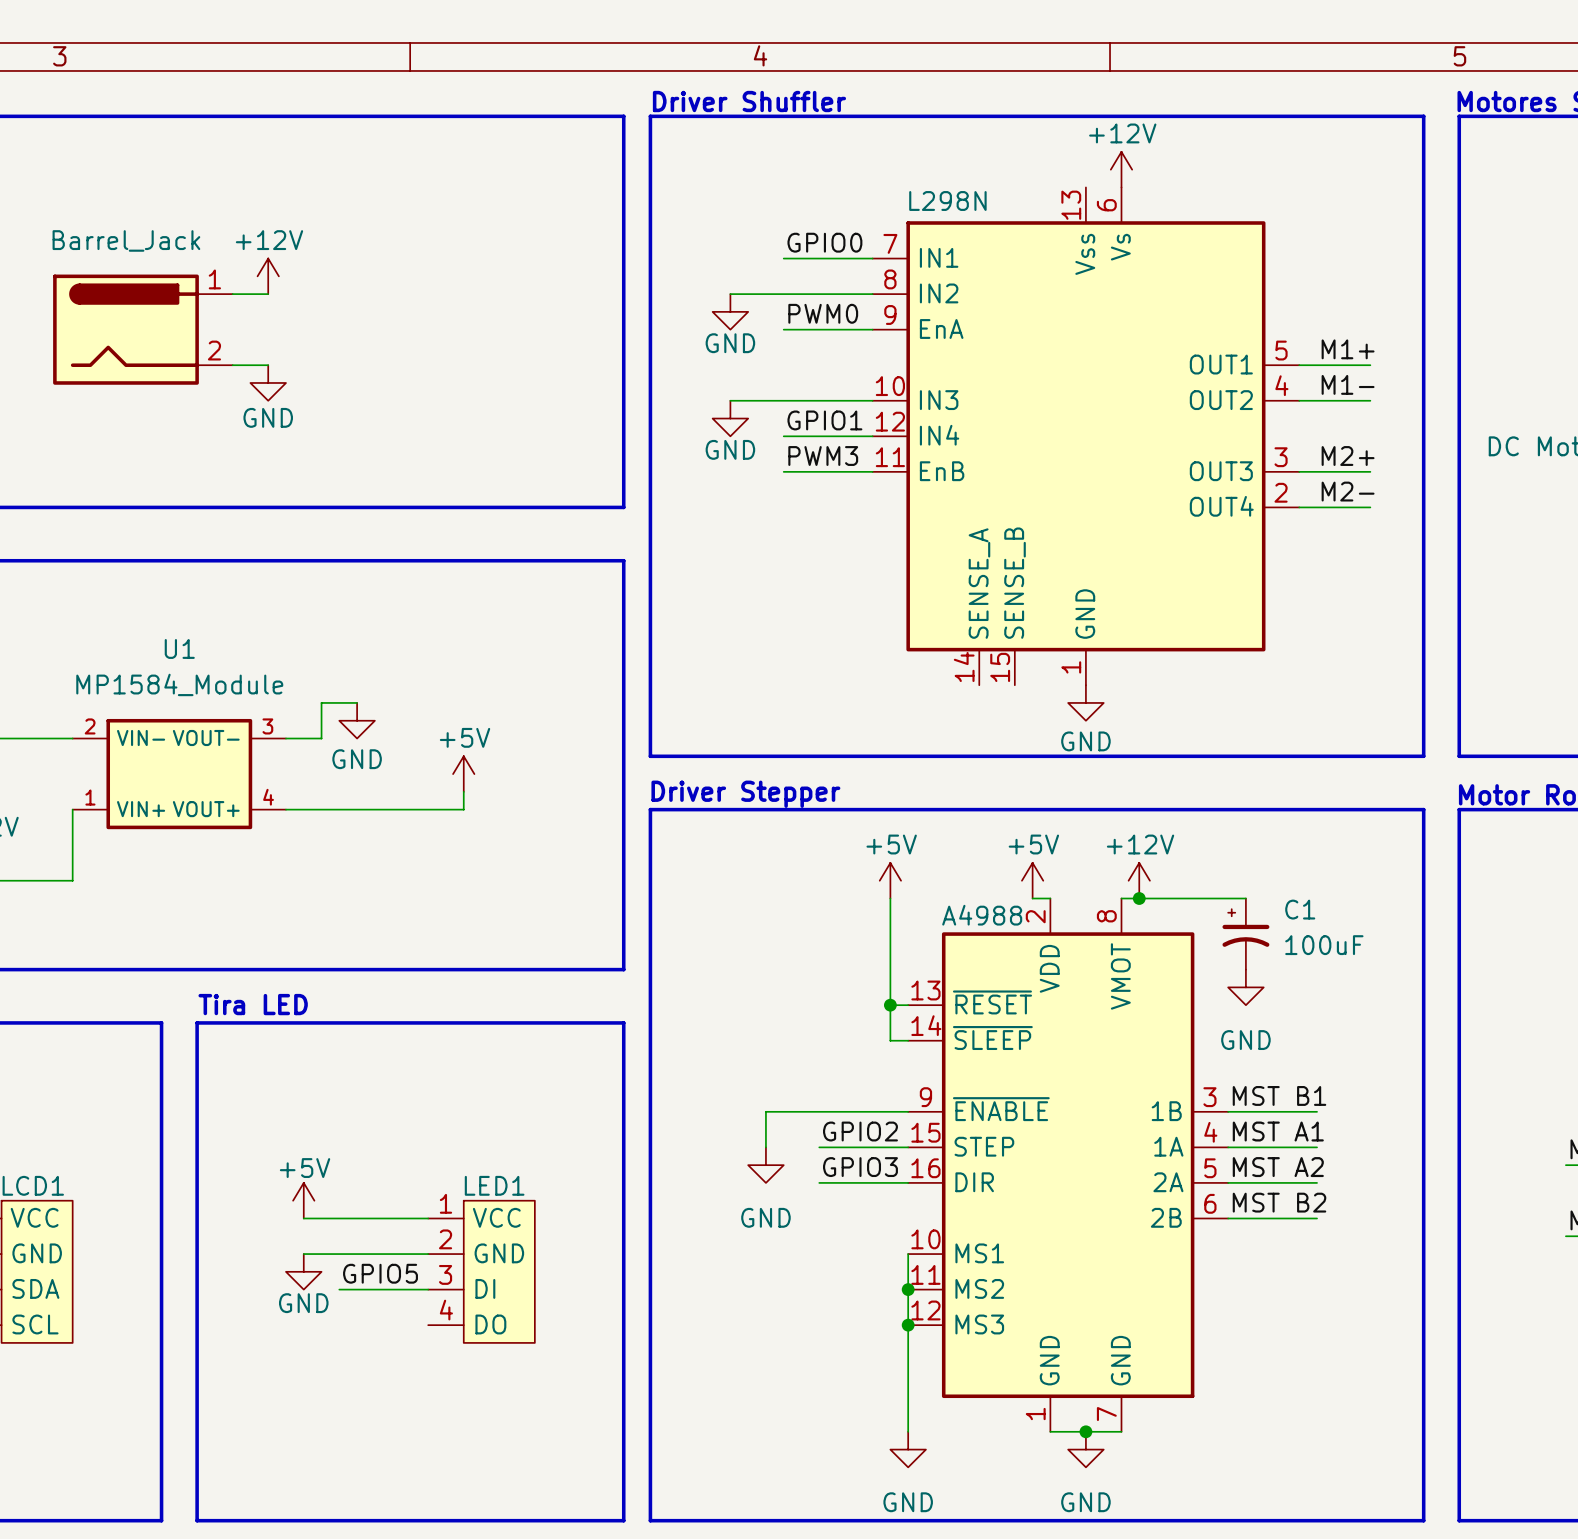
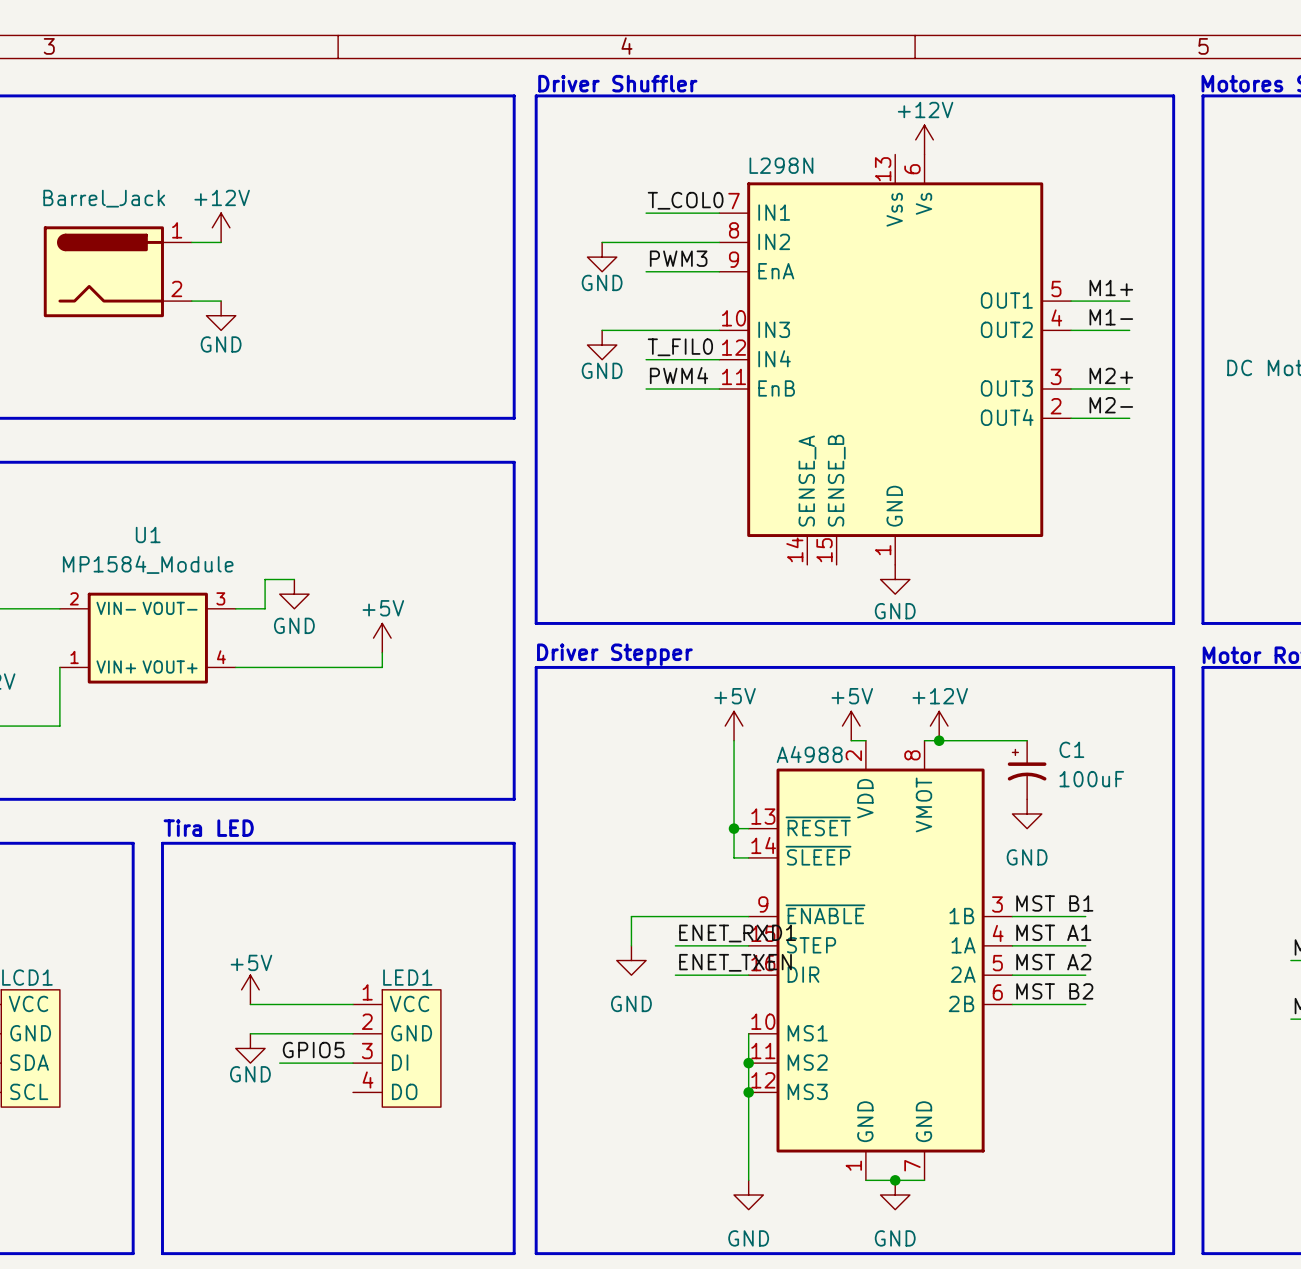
label: GPIO0 (824, 242) -> T_COL0 (685, 200)
label: PWM0 (823, 313) -> PWM3 (678, 258)
label: GPIO1 (824, 420) -> T_FIL0 (680, 347)
label: PWM3 (823, 456) -> PWM4 (679, 375)
label: GPIO2 (860, 1131) -> ENET_RXD1 (737, 933)
label: GPIO3 (860, 1167) -> ENET_TXEN (735, 962)

